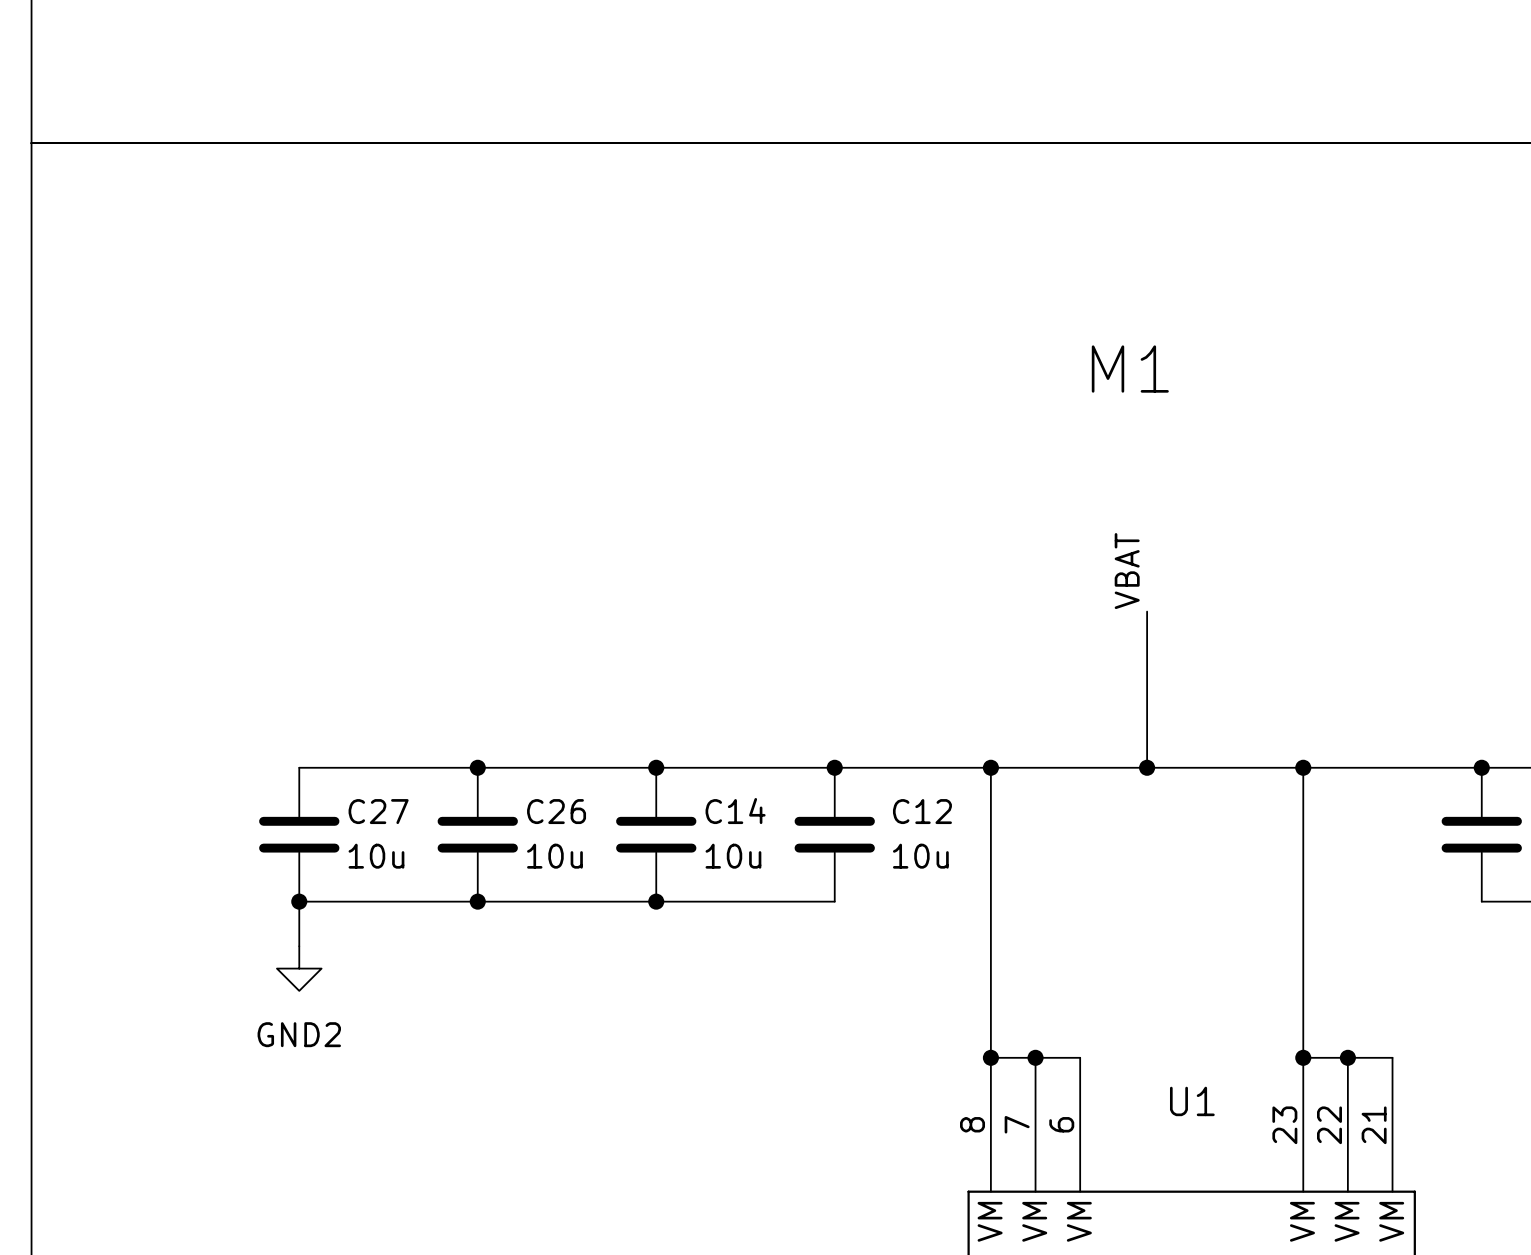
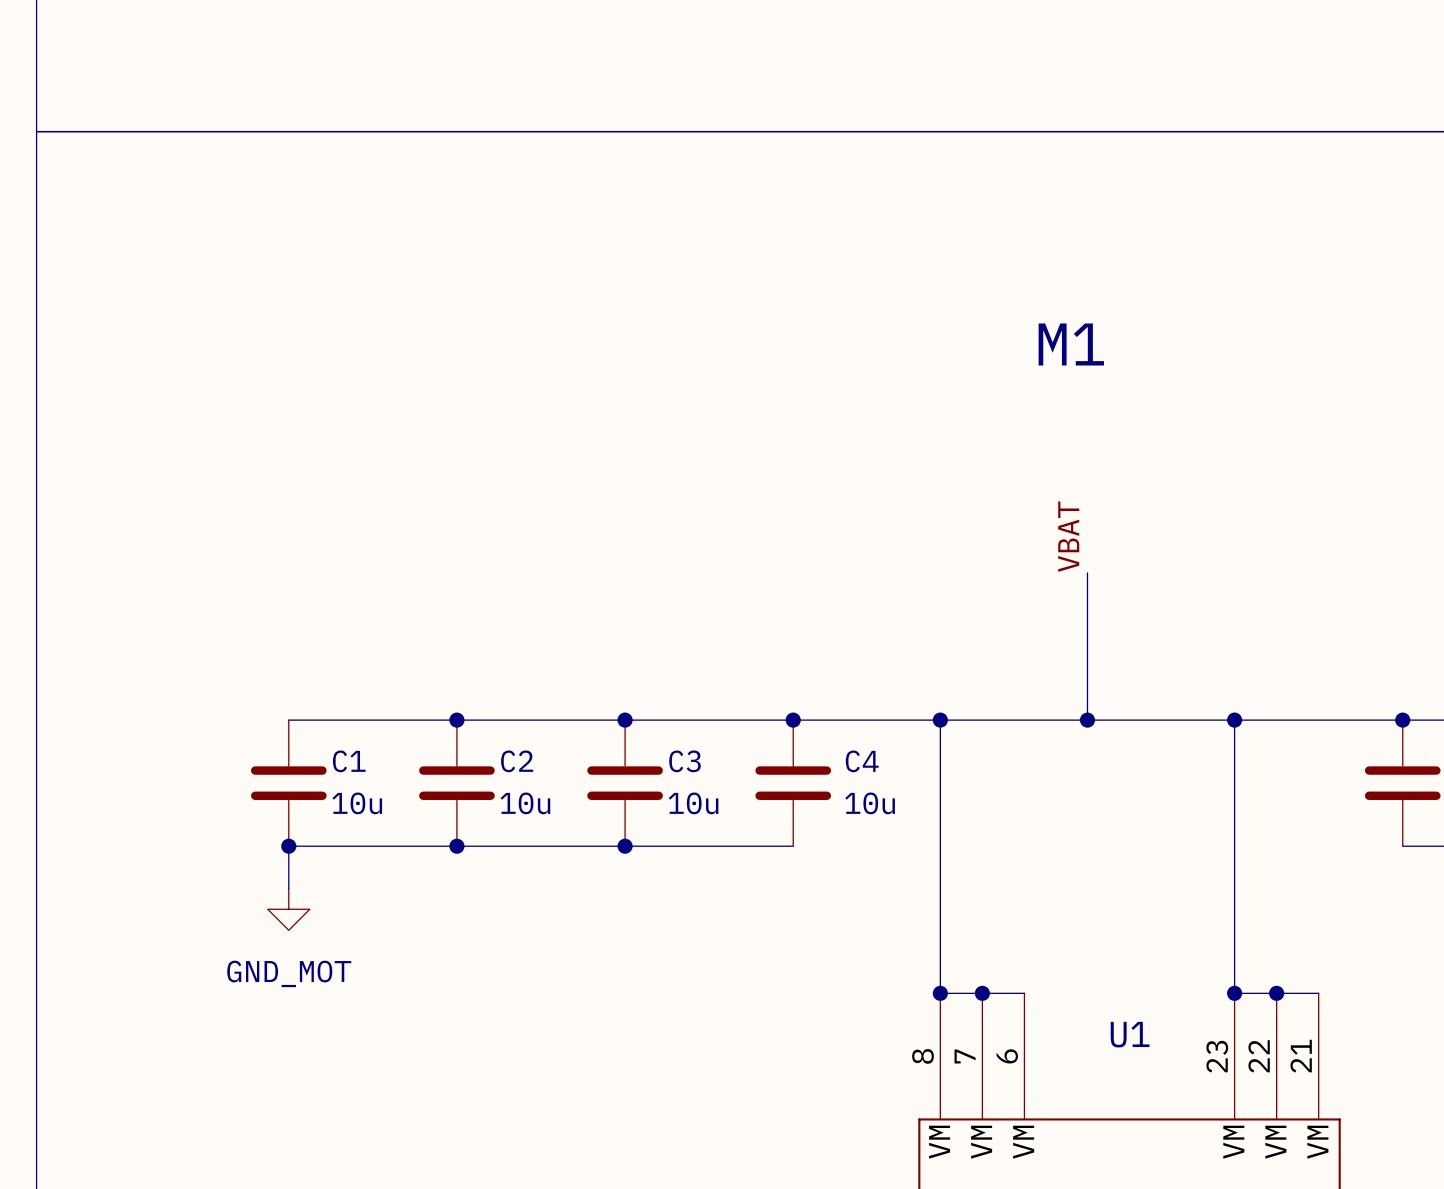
C27 name: C27 (378, 811) -> C1 (349, 761)
C26 name: C26 (556, 811) -> C2 (517, 761)
C14 name: C14 (735, 811) -> C3 (685, 761)
C12 name: C12 (922, 811) -> C4 (862, 761)
power symbol: GND2 (299, 968) -> GND_MOT (288, 909)

